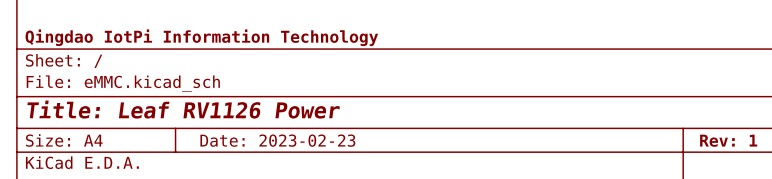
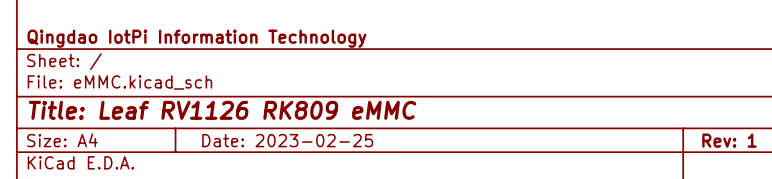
title block: Title: Leaf RV1126 Power (183, 109) -> Title: Leaf RV1126 RK809 eMMC (222, 110)
title block: Date: 2023-02-23 (277, 140) -> Date: 2023-02-25 (287, 140)

